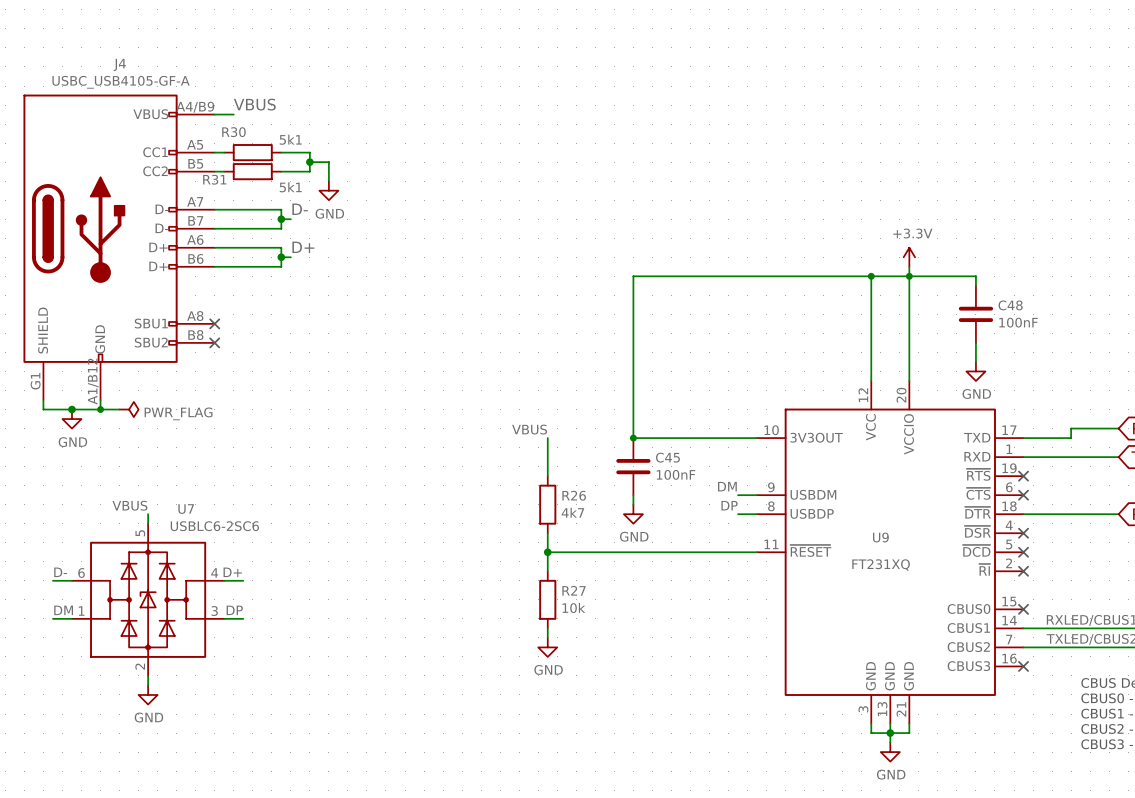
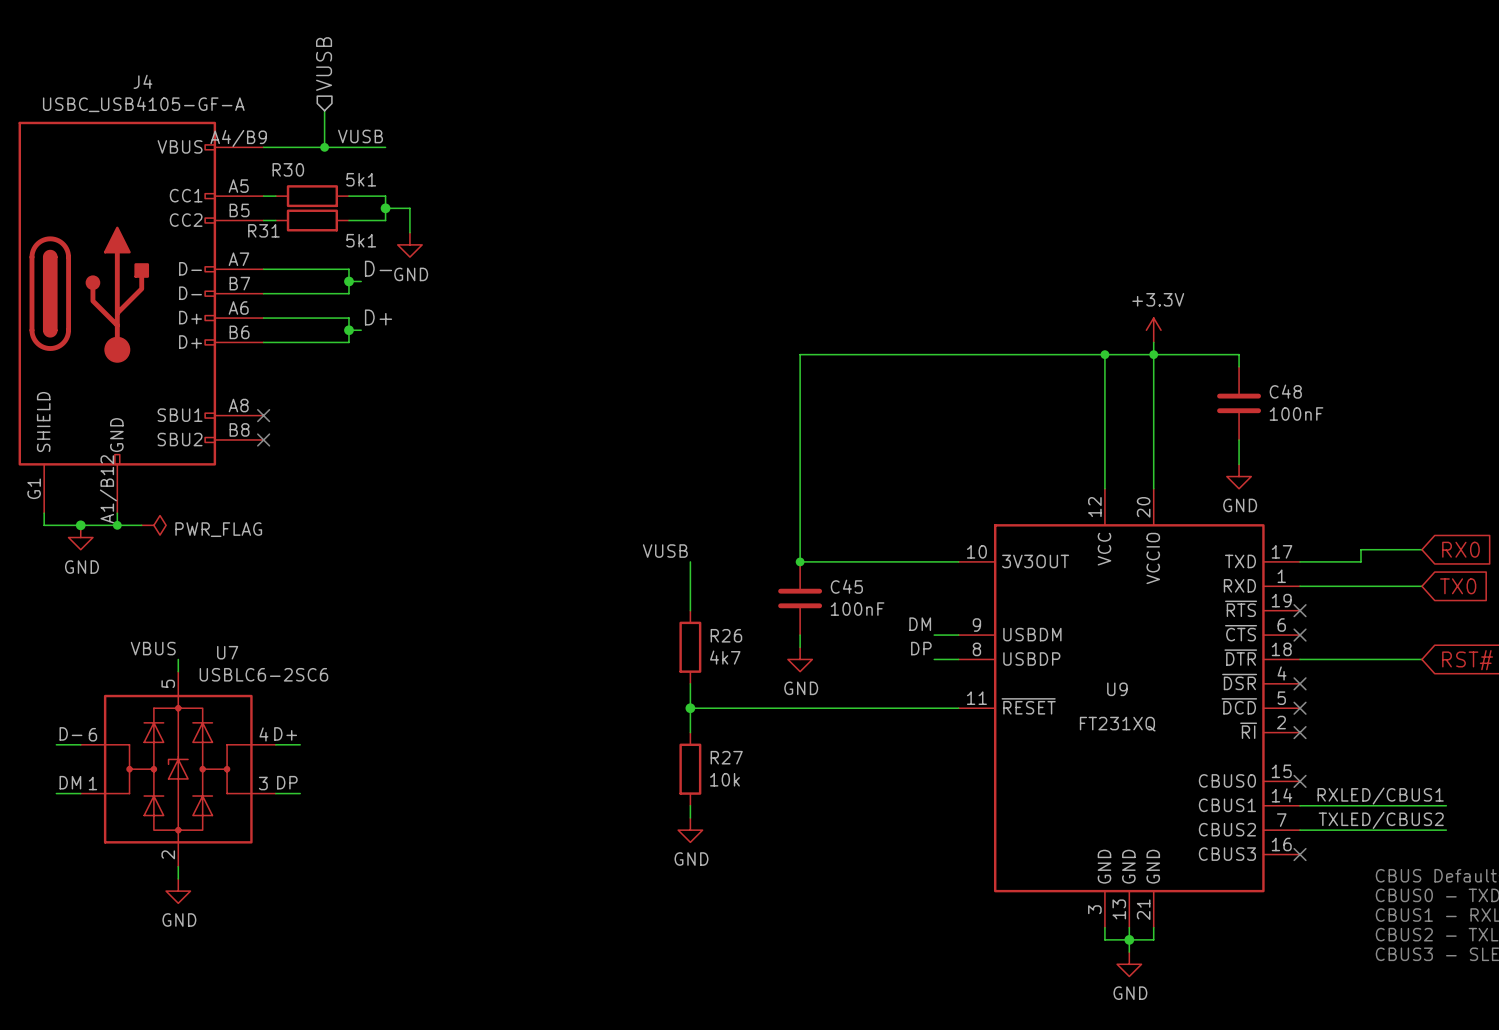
hierarchical label: none -> VUSB (324, 64)
wire: none -> (324, 110) (324, 147)
label: VBUS (254, 104) -> VUSB (360, 136)
wire: none -> (288, 147) (385, 147)
junction: none -> (324, 147)
label: VBUS (529, 429) -> VUSB (665, 551)

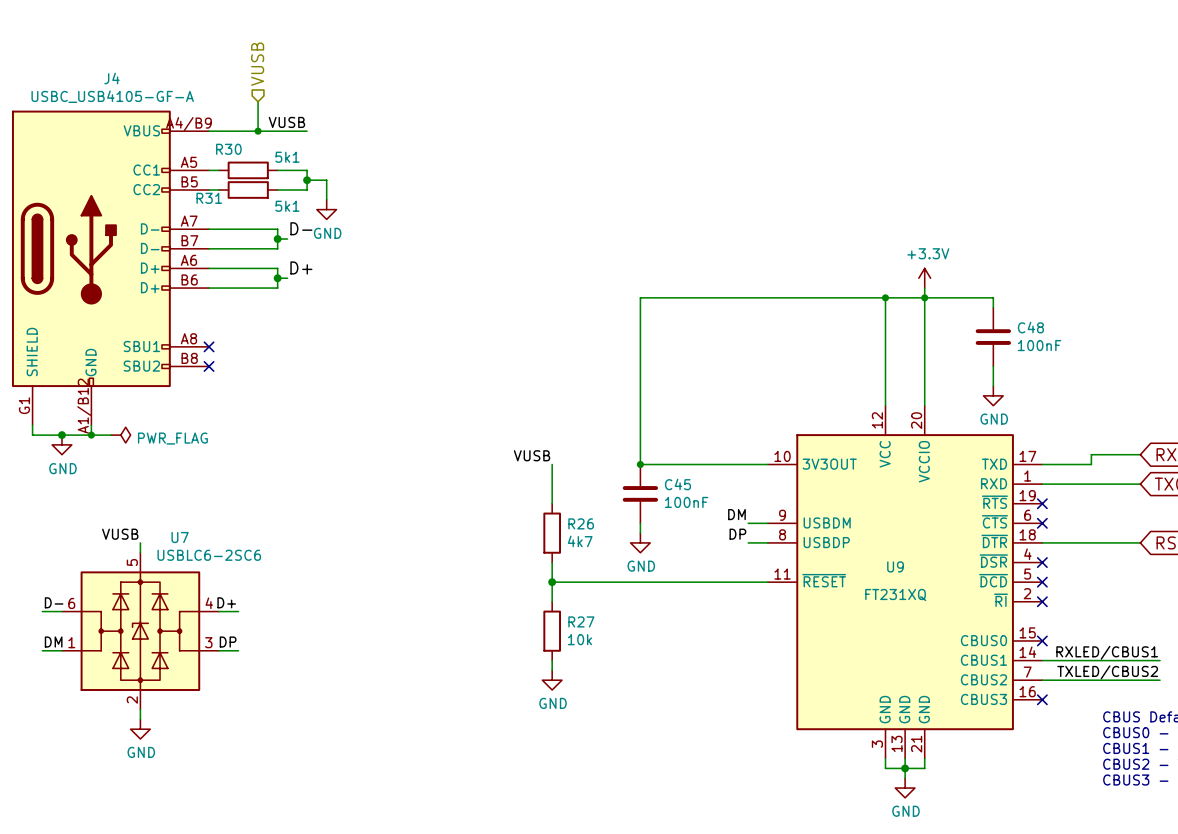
label: VBUS (153, 648) -> VUSB (120, 534)

